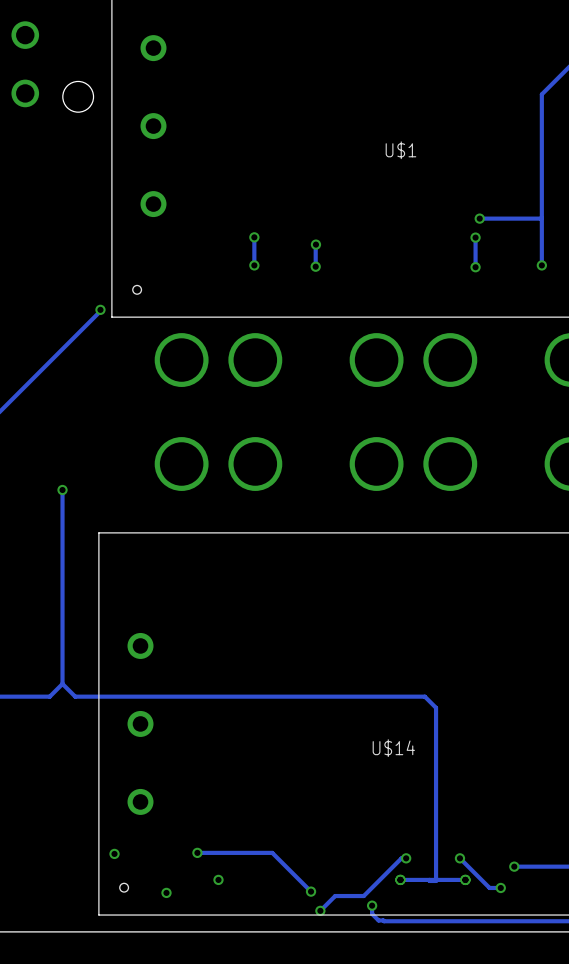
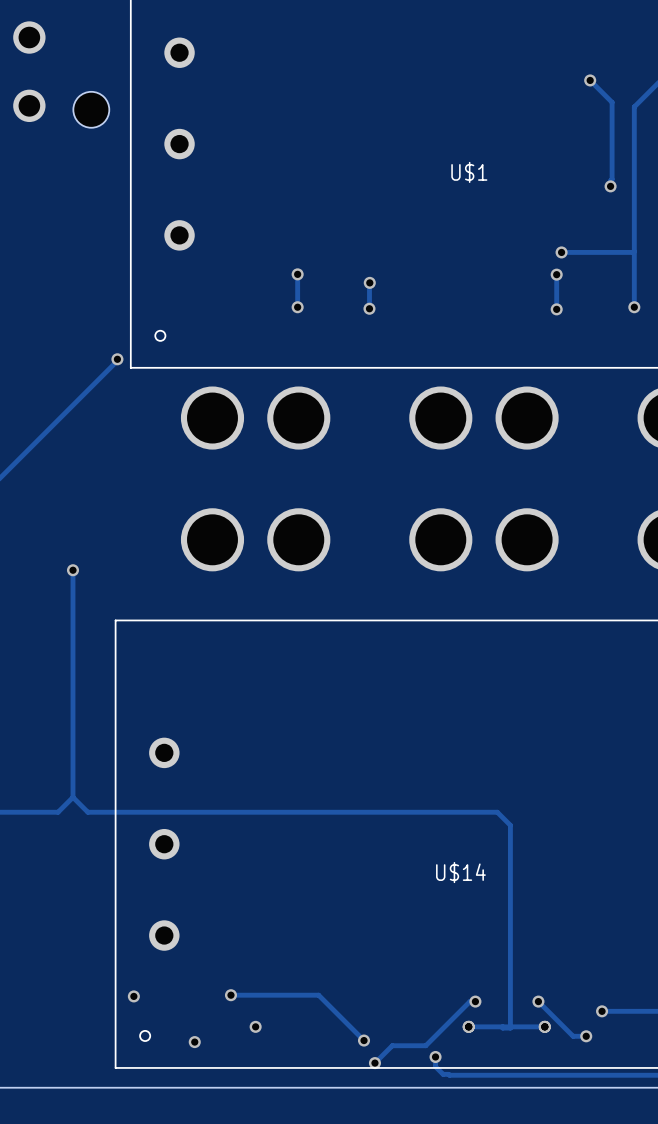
track: none -> (590, 80) (612, 102) (610, 186)
via: none -> (590, 80)
via: none -> (610, 186)

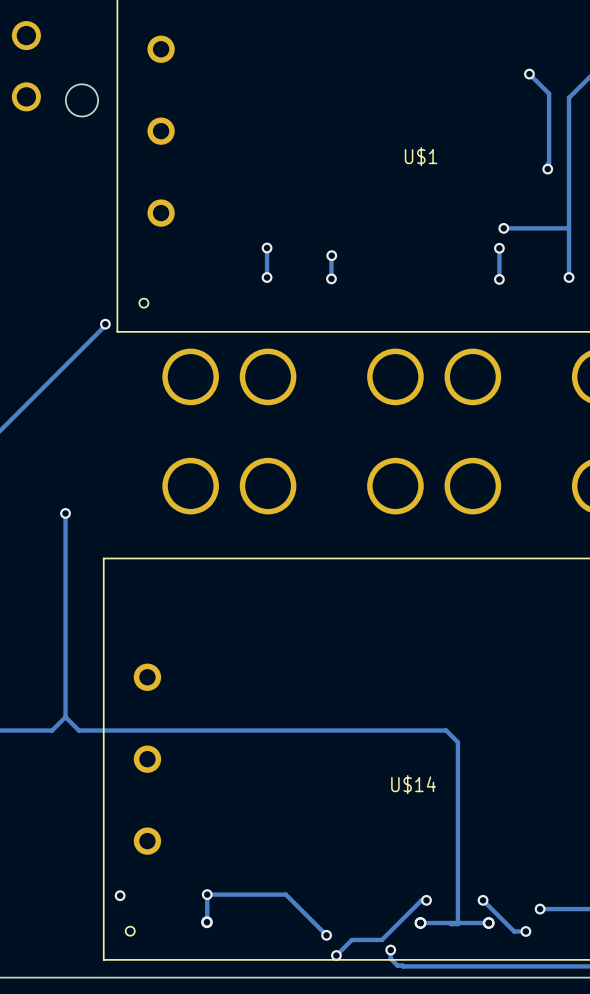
track: none -> (207, 894) (206, 922)
via: none -> (206, 922)
via: (255, 1026) -> none
via: none -> (420, 923)
via: none -> (488, 923)
via: (194, 1042) -> none

